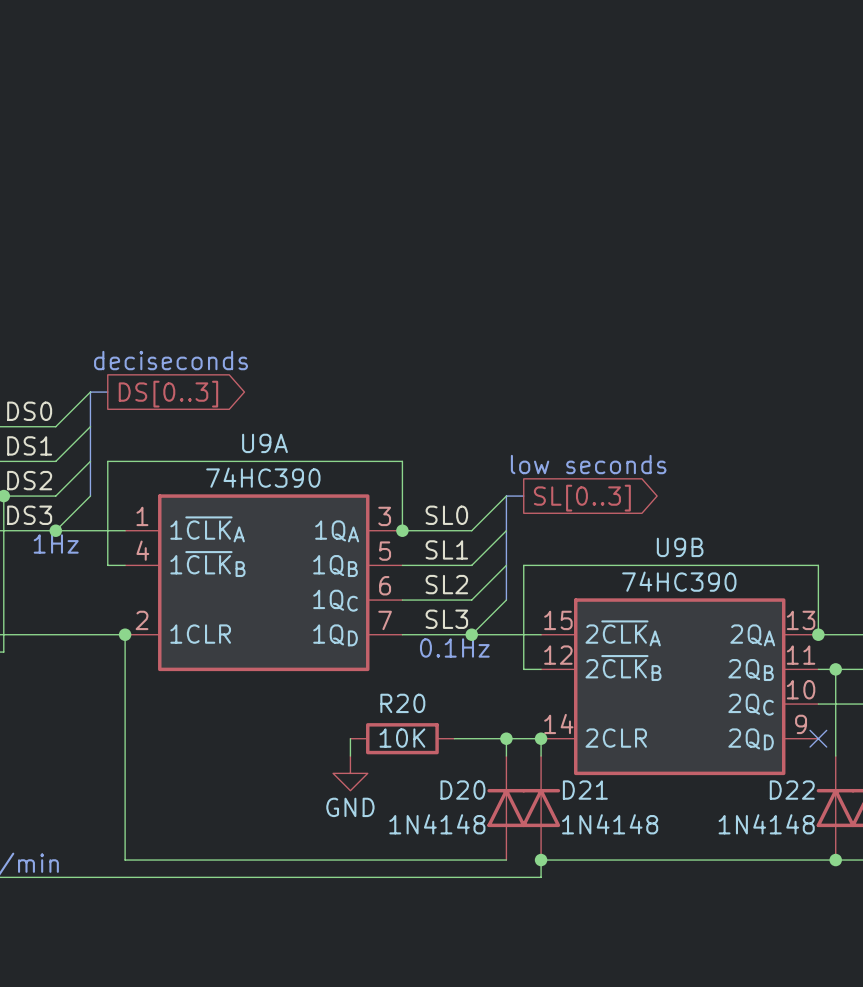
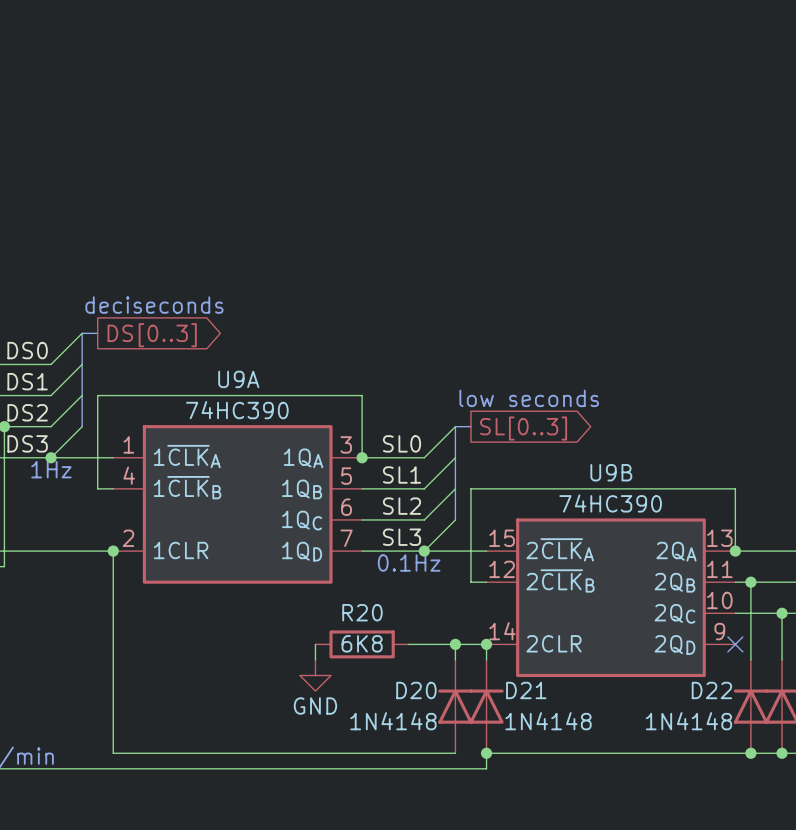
R20 value: 10K (402, 738) -> 6K8 (362, 643)

